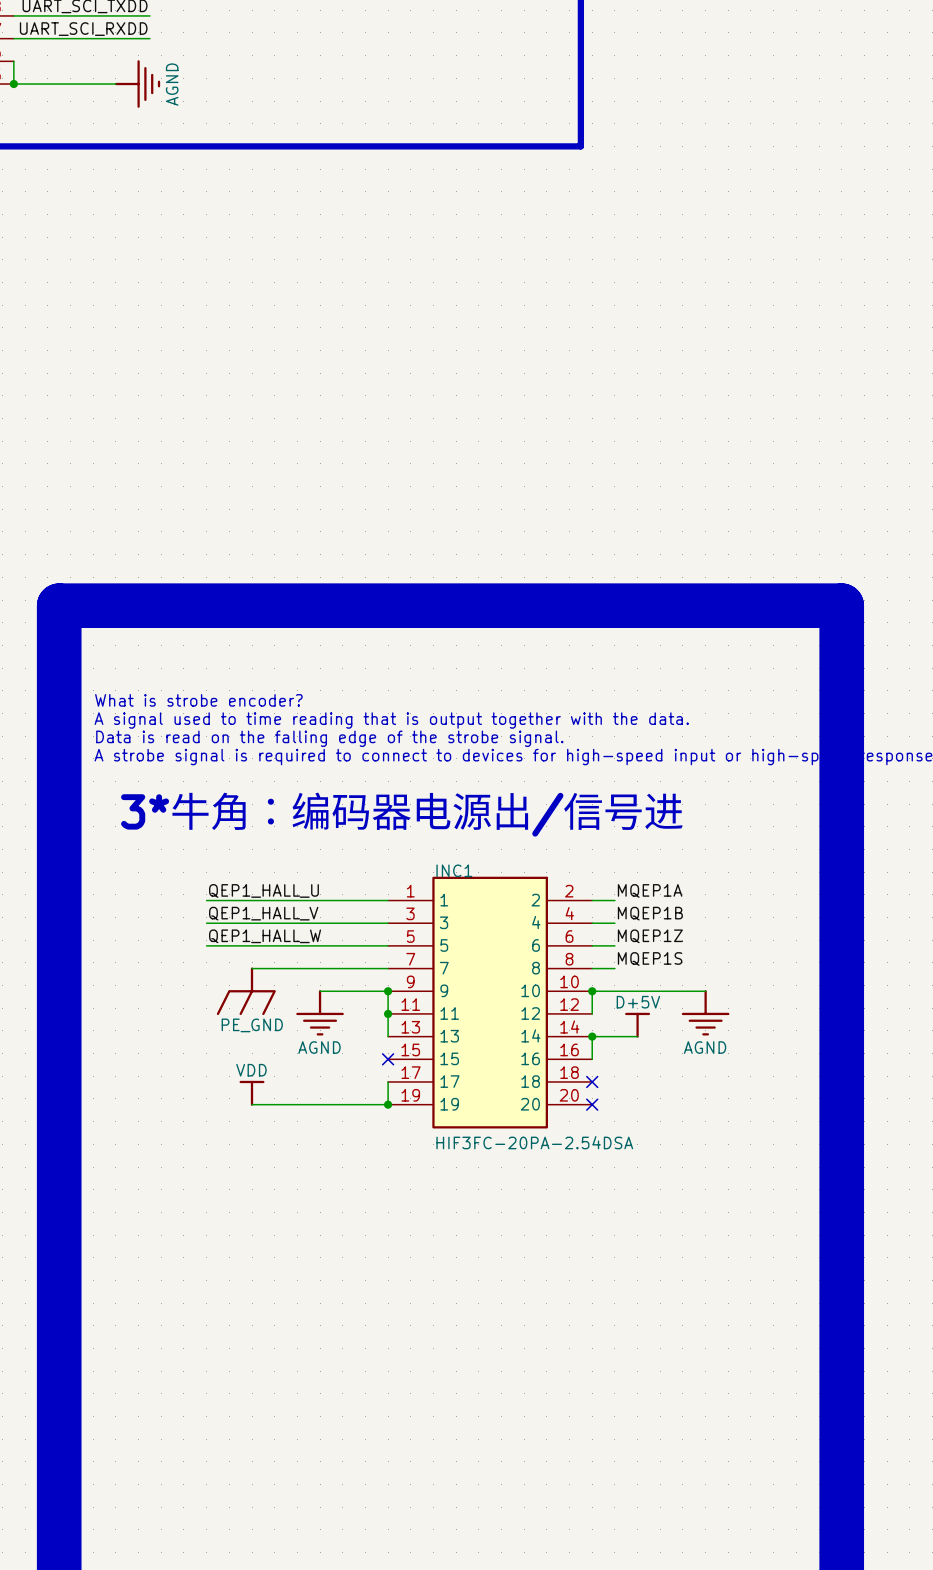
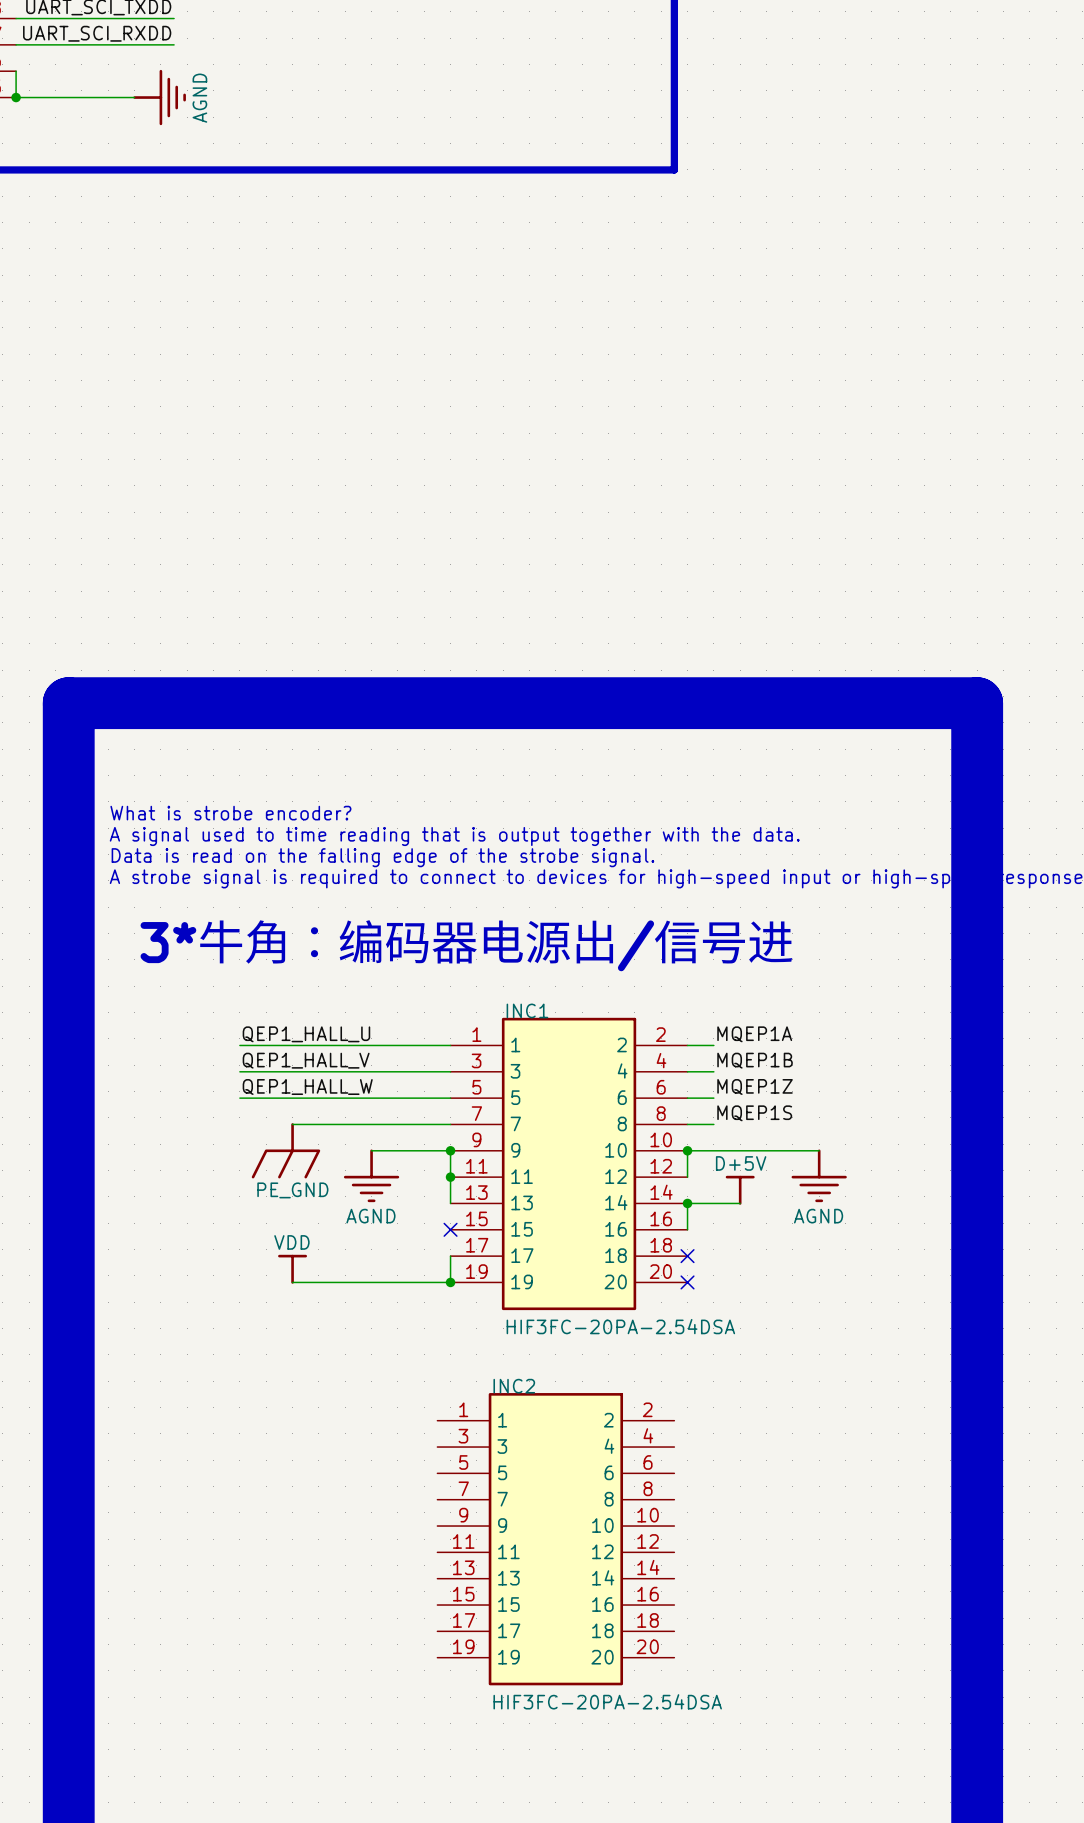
INC2: none -> HIF3FC-20PA-2.54DSA (555, 1539)

